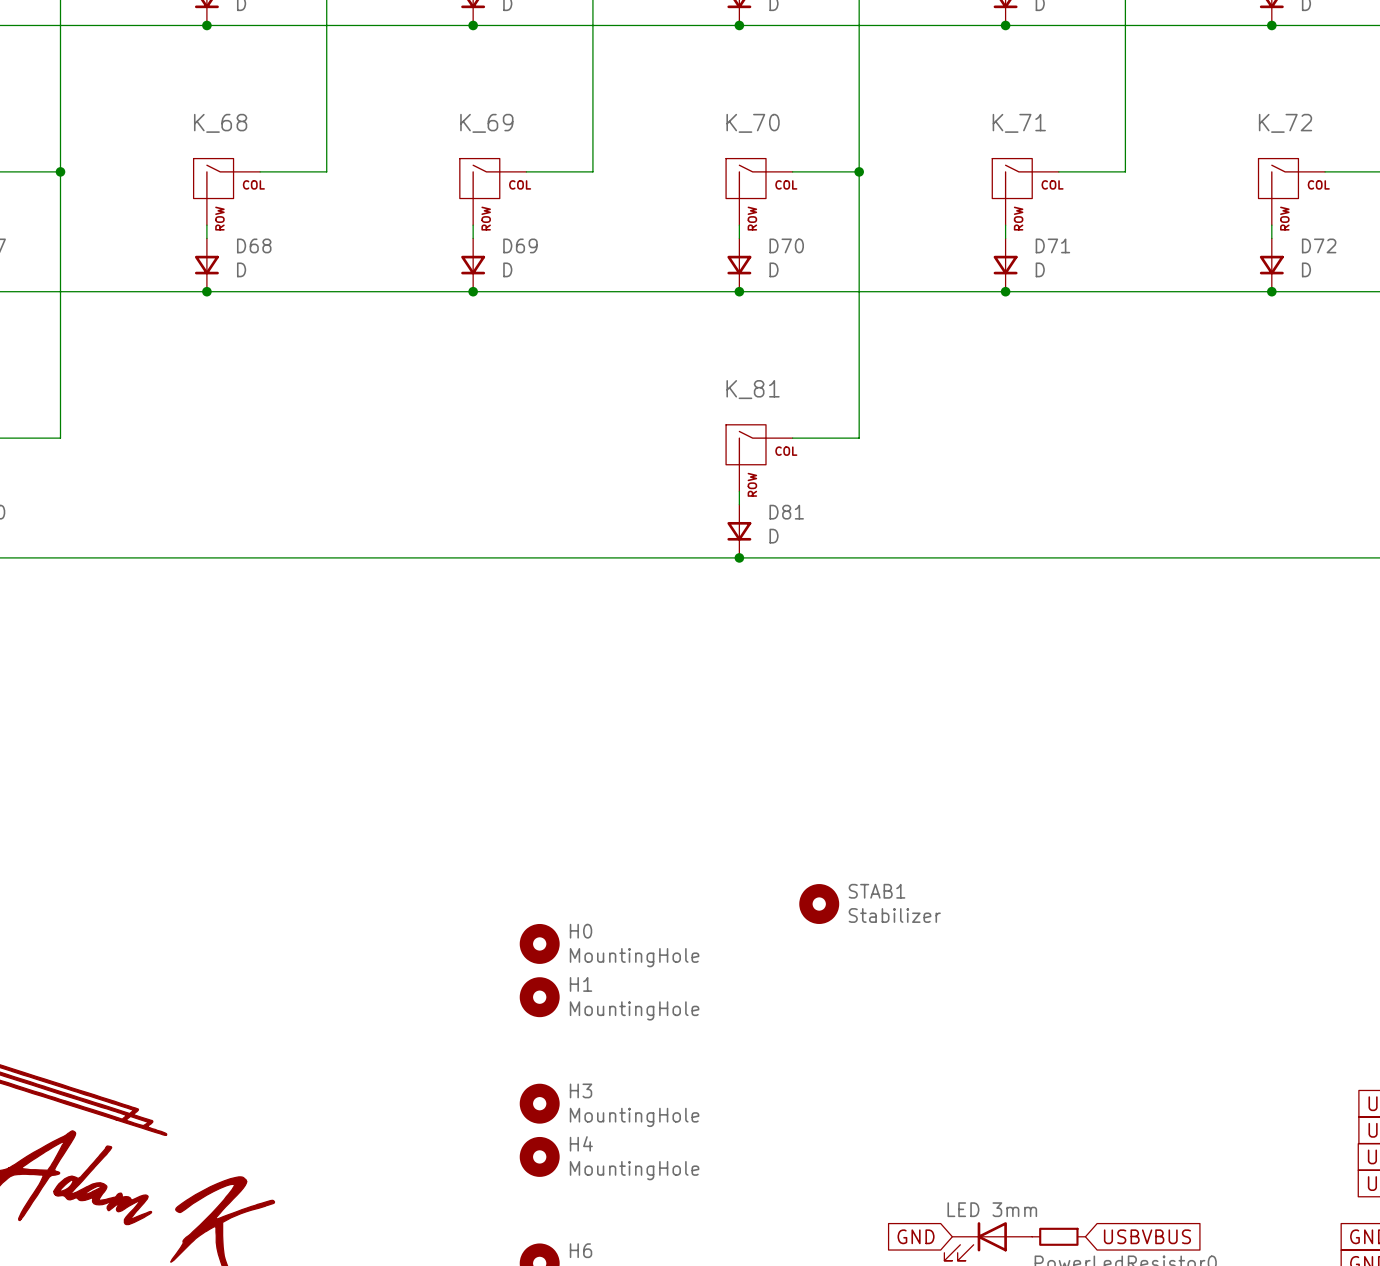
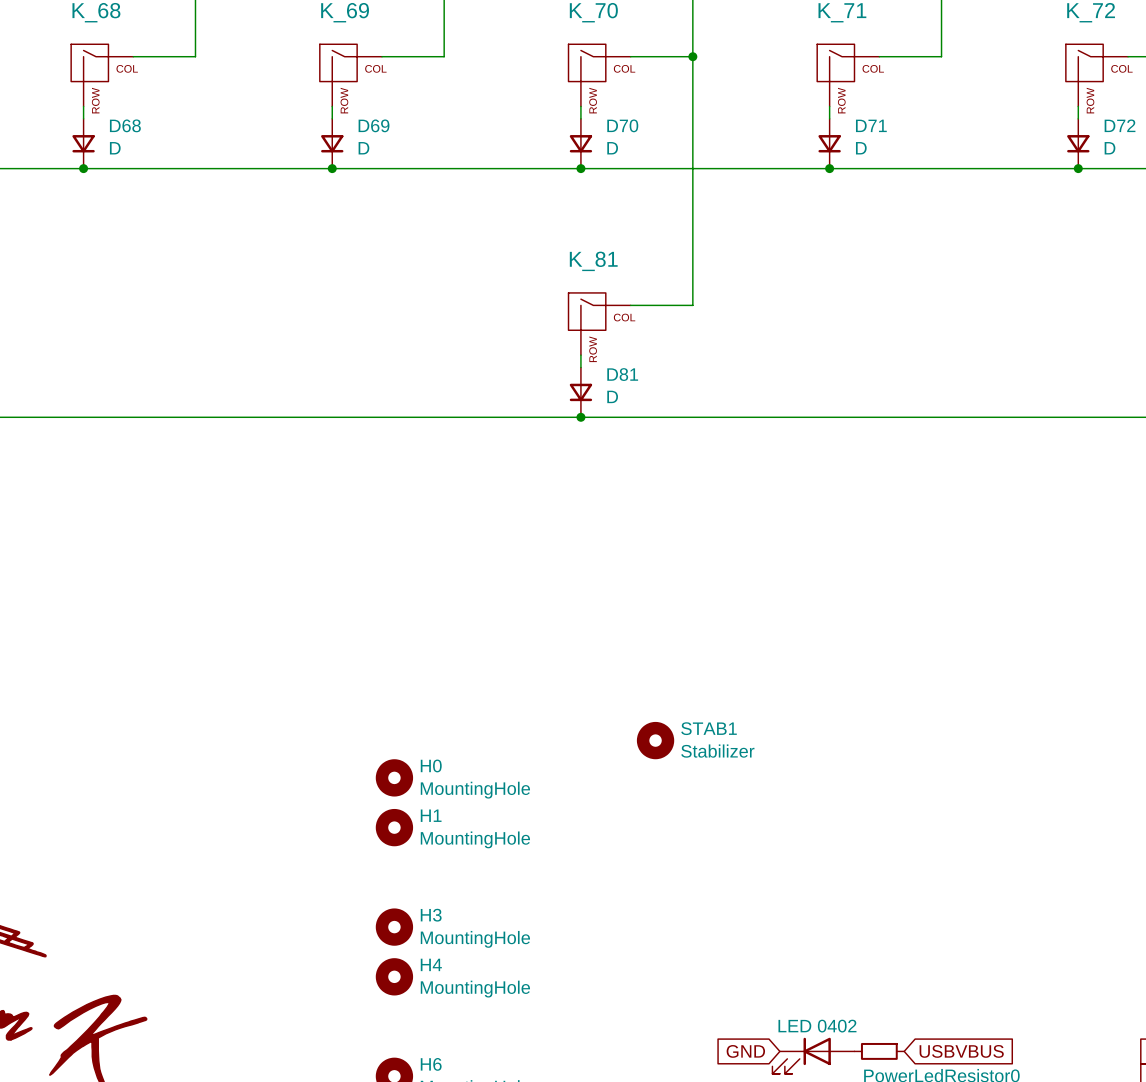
part value: LED 3mm (992, 1209) -> LED 0402 (817, 1026)

